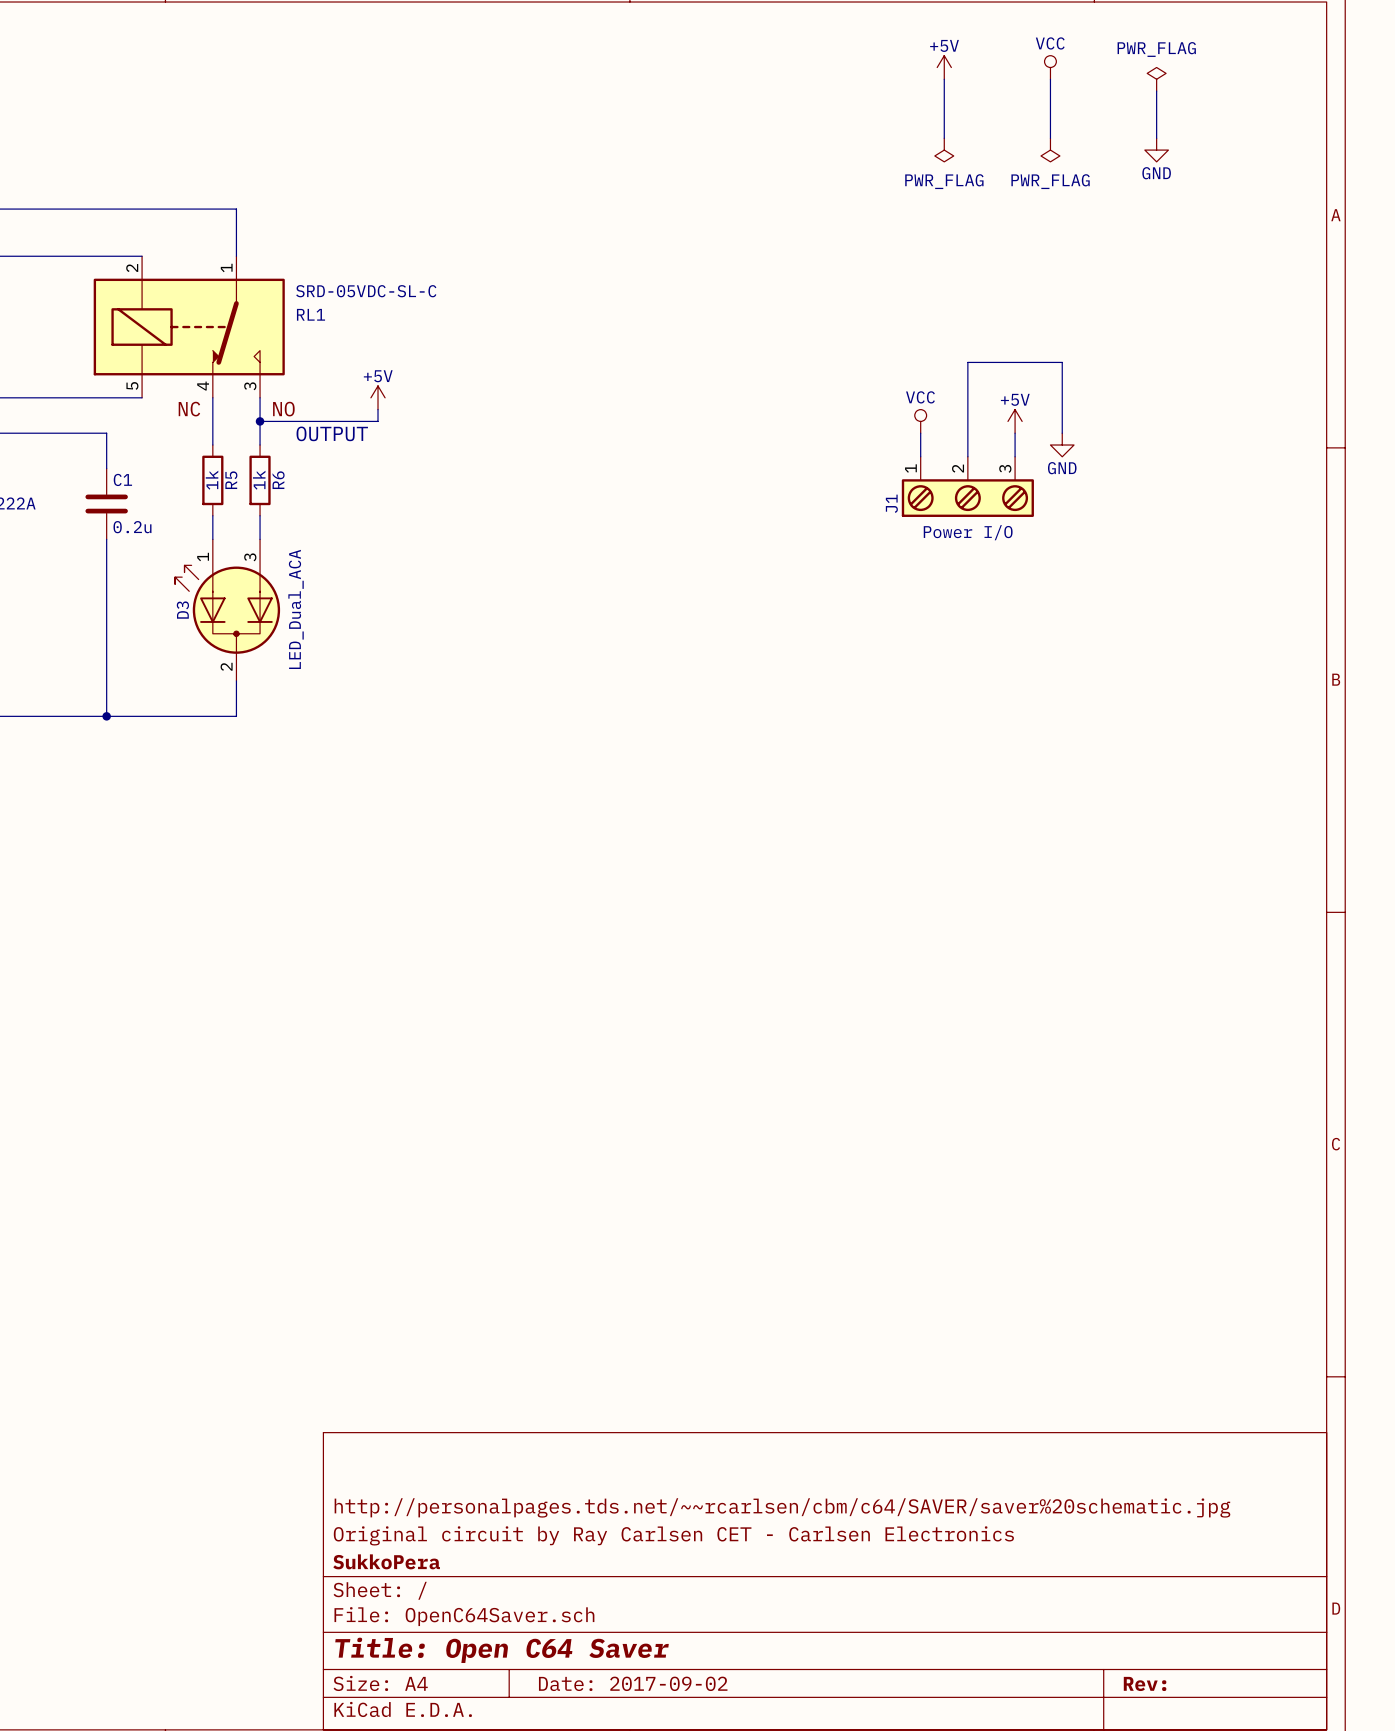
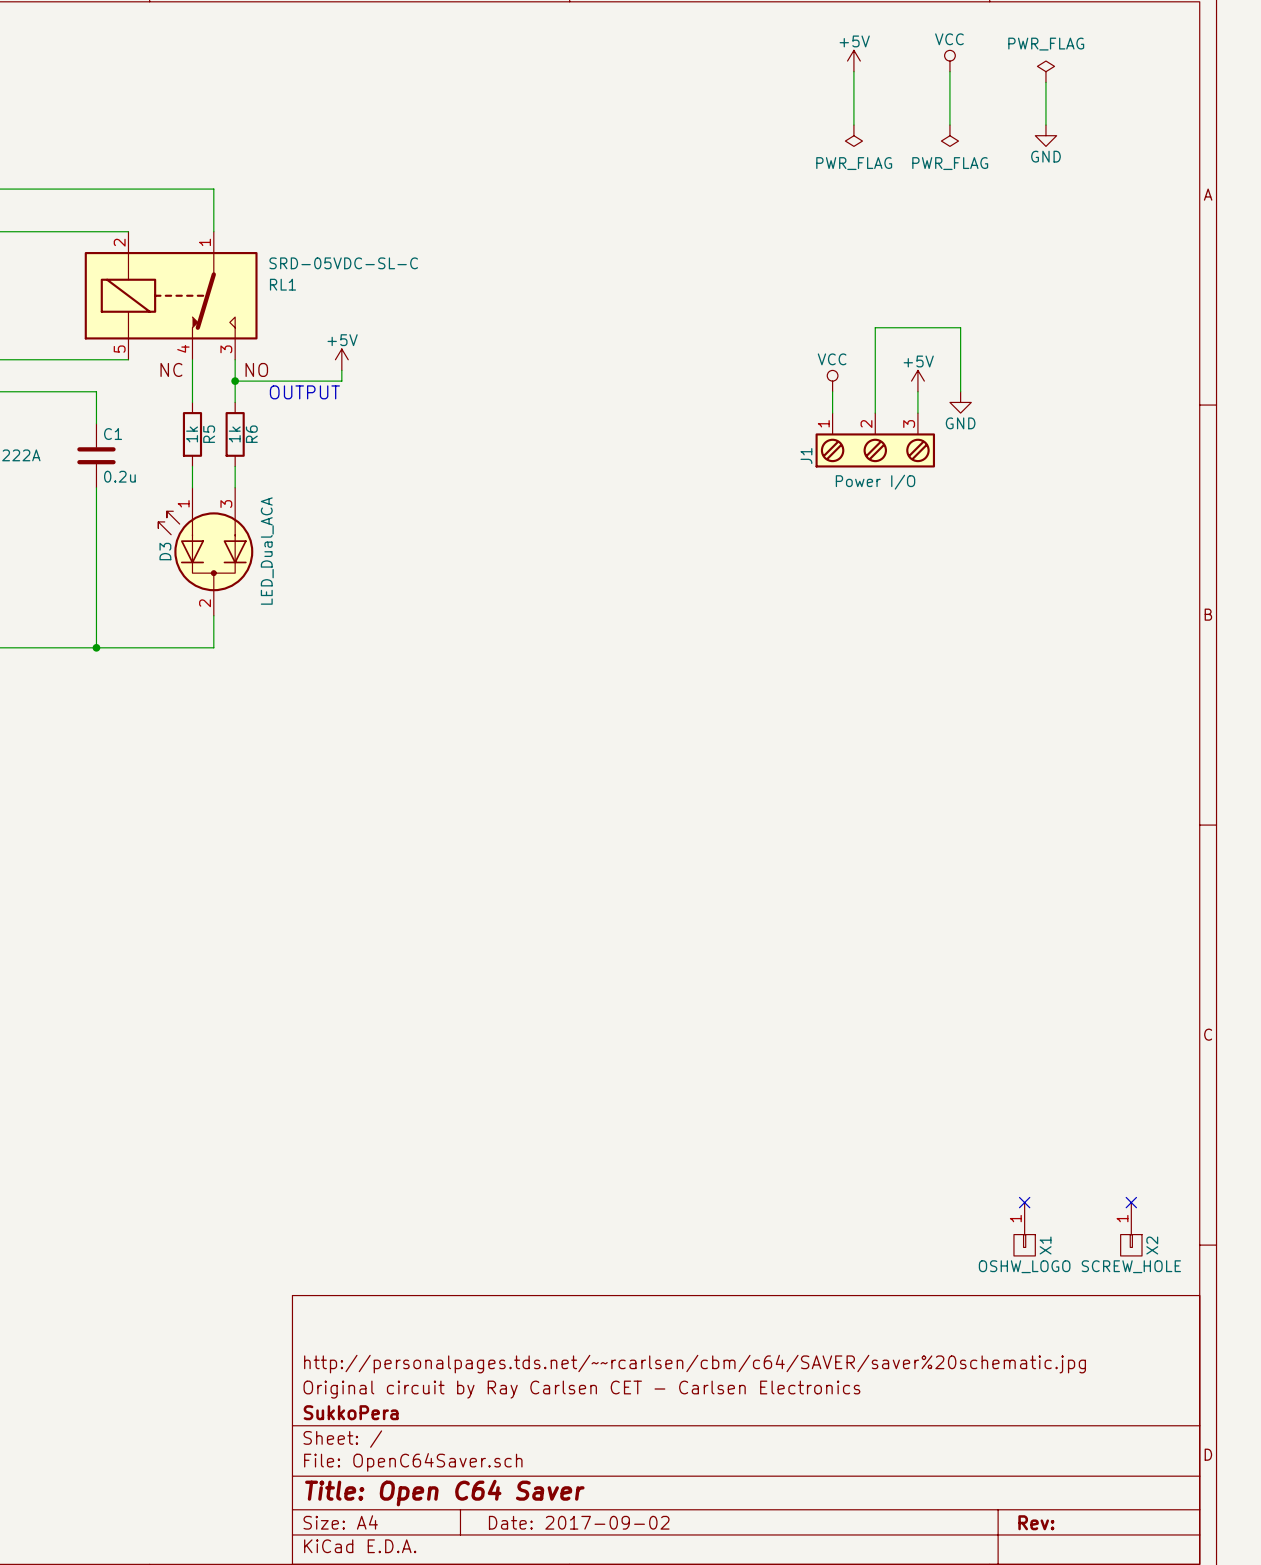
no-connect mark: none -> (1024, 1202)
no-connect mark: none -> (1131, 1202)
X1: none -> OSHW_LOGO (1024, 1229)
X2: none -> SCREW_HOLE (1131, 1229)

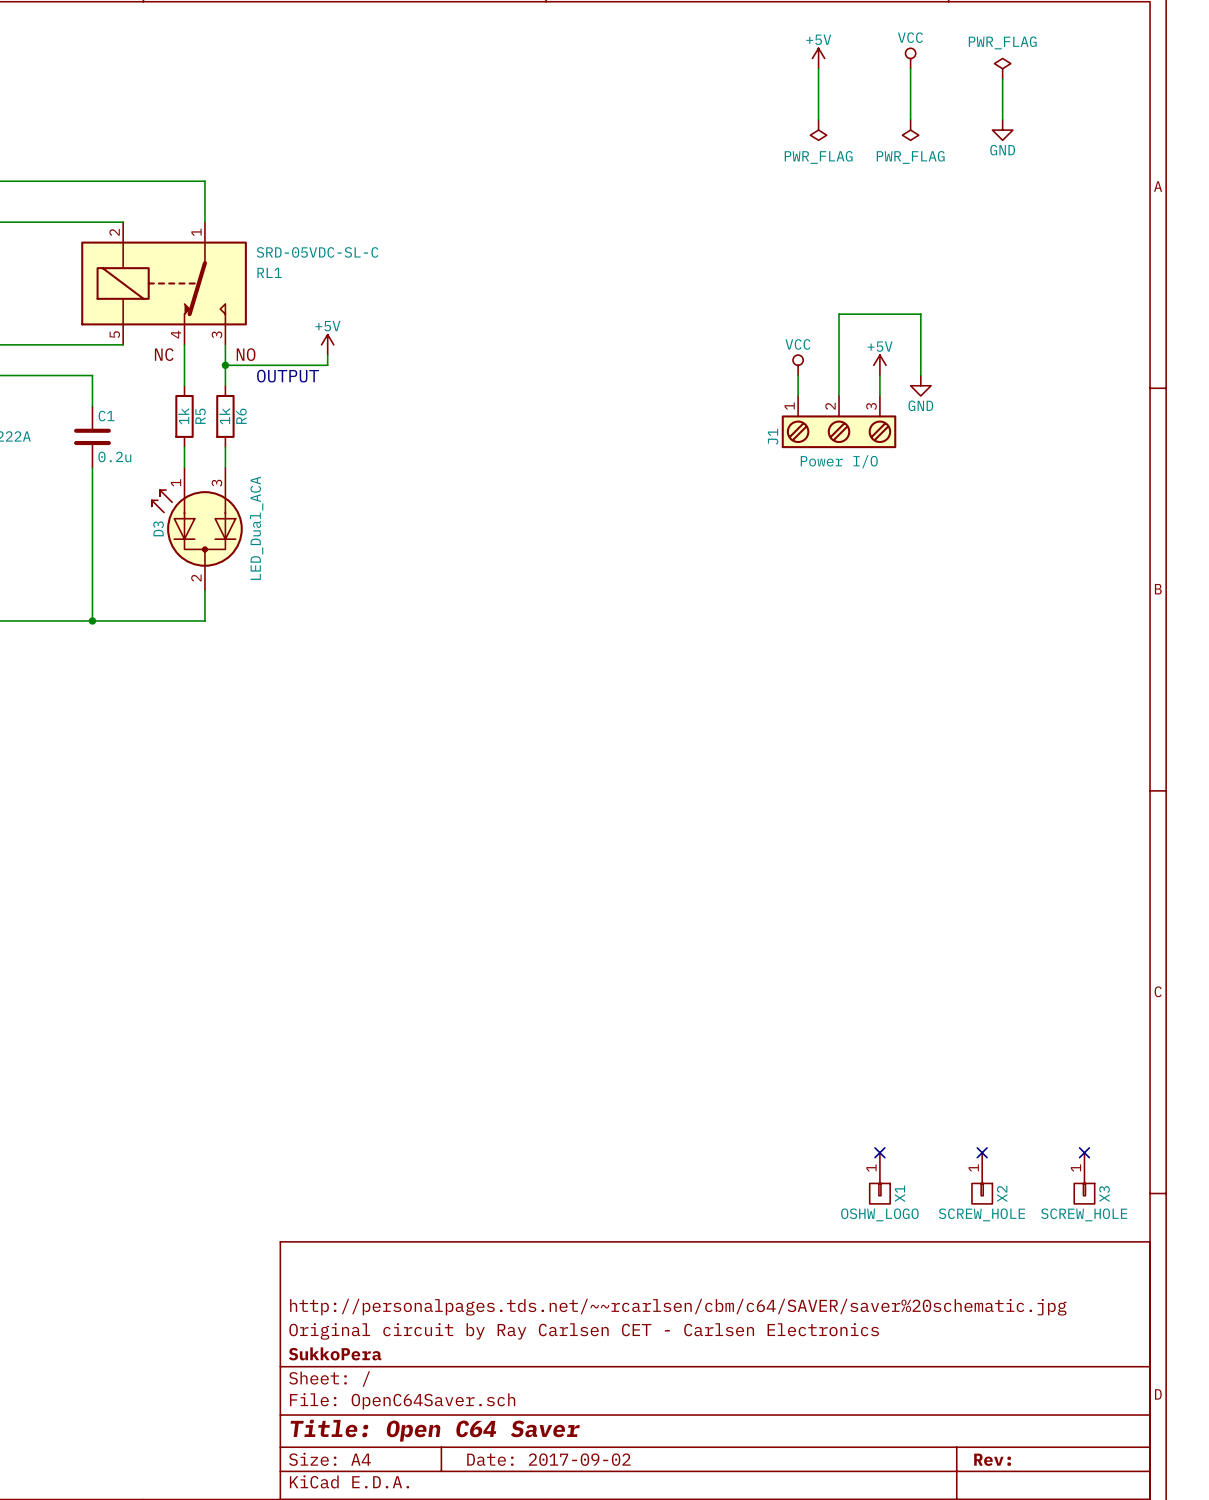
no-connect mark: none -> (879, 1152)
X1: none -> OSHW_LOGO (879, 1178)
X1 name: X1 (1045, 1245) -> X2 (1002, 1193)
X2 name: X2 (1152, 1245) -> X3 (1104, 1194)
X1 value: OSHW_LOGO (1024, 1266) -> SCREW_HOLE (981, 1214)

